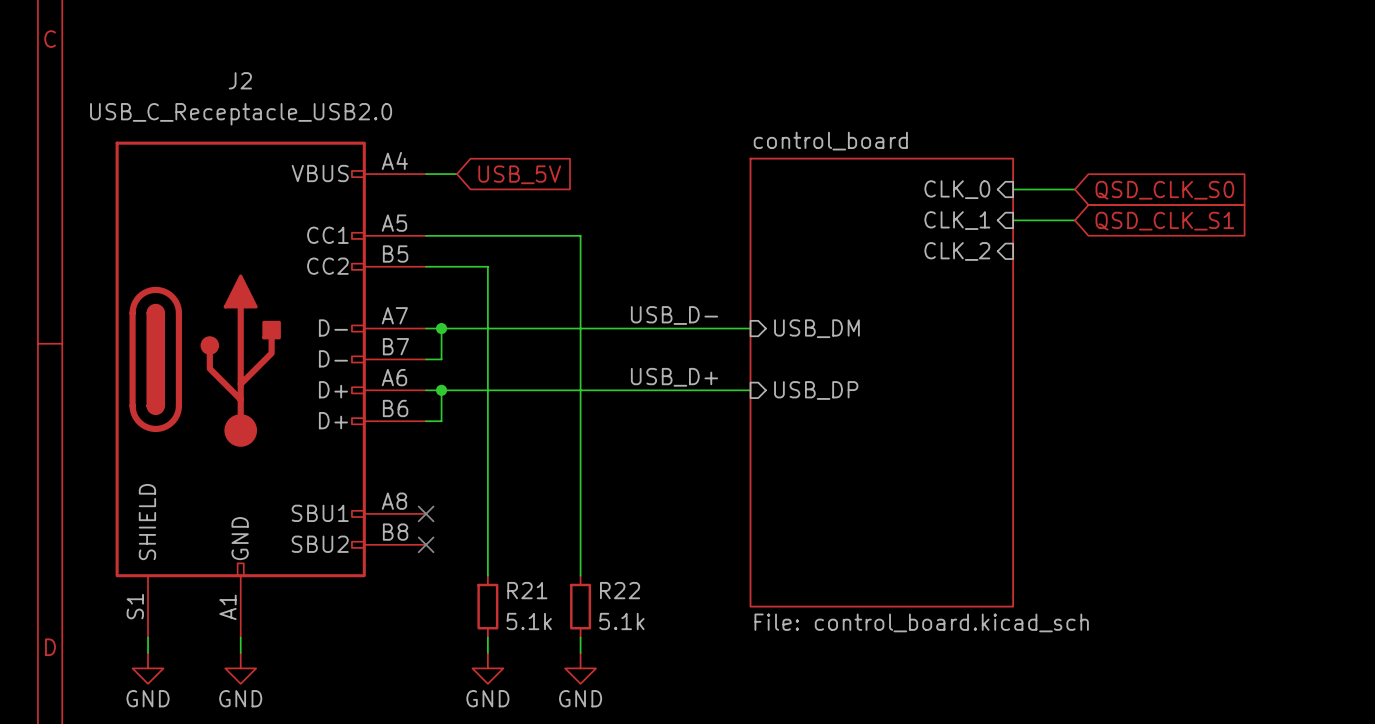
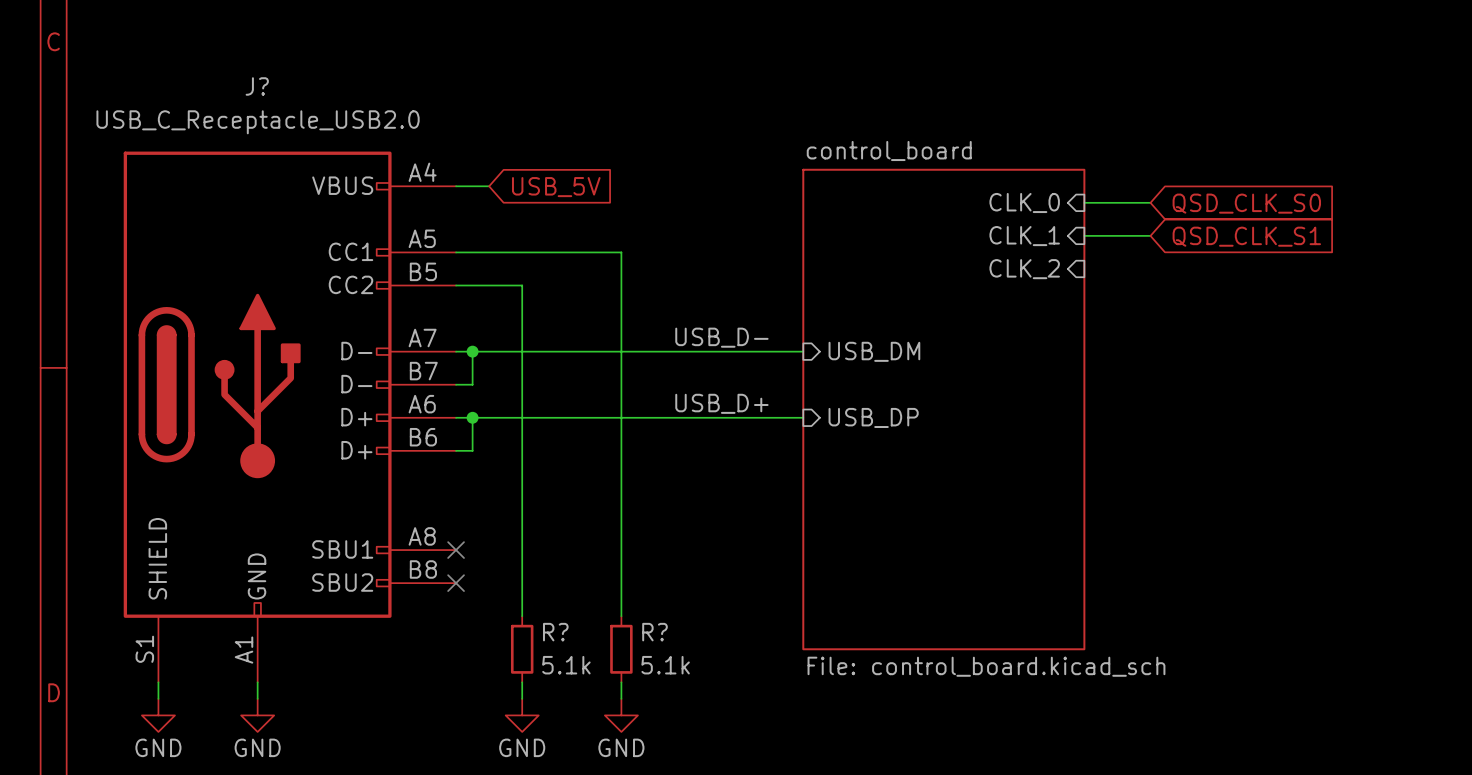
J2 name: J2 (240, 80) -> J? (257, 86)
R21 name: R21 (527, 590) -> R? (555, 632)
R22 name: R22 (620, 590) -> R? (654, 632)

